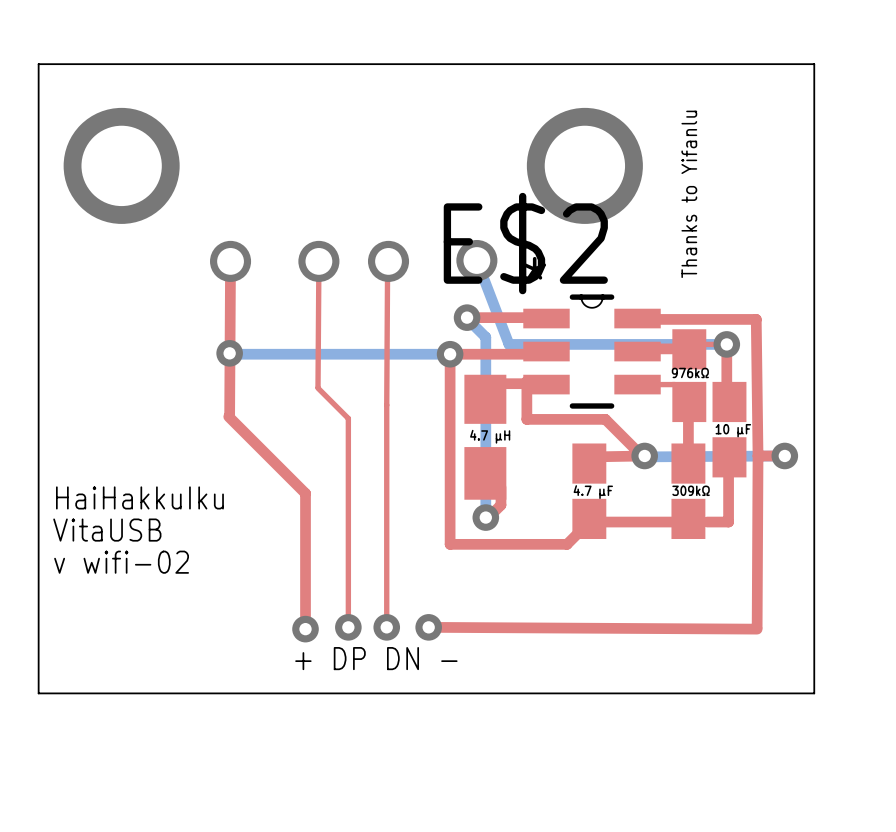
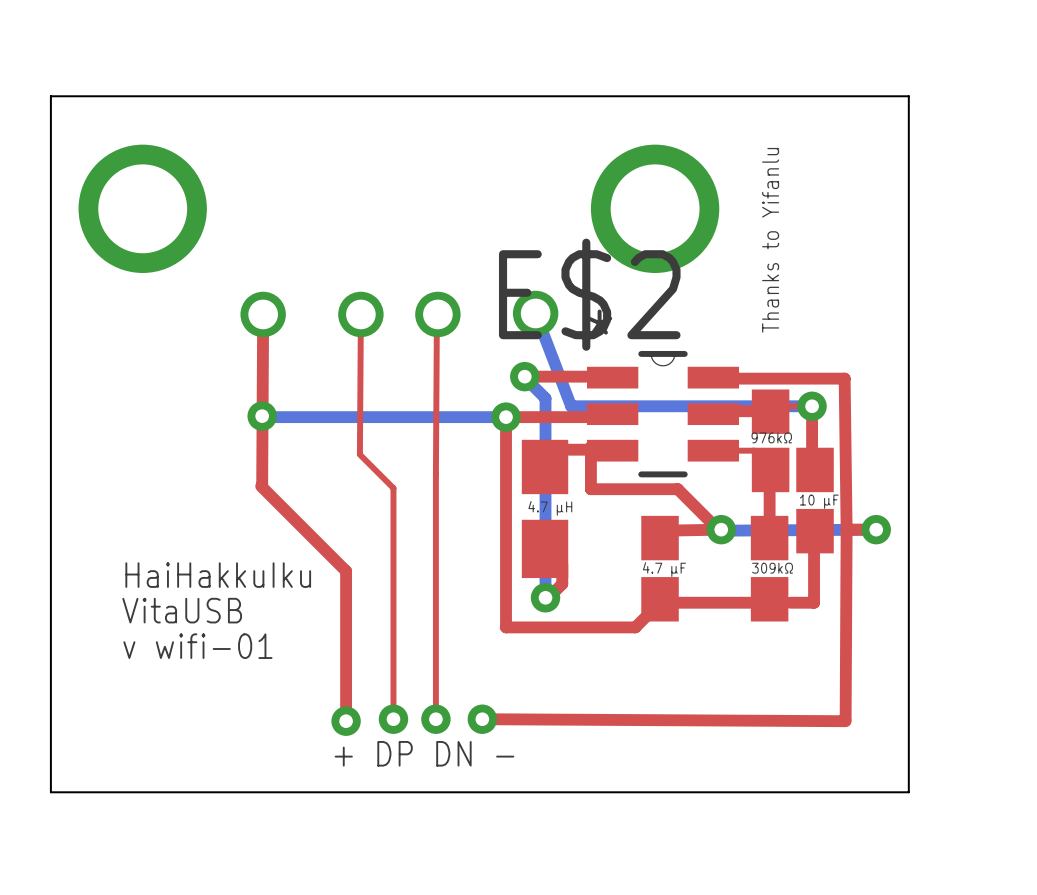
text position: HaiHakkuIku (139, 497) -> HaiHakkuIku (218, 575)
text position: VitaUSB (107, 530) -> VitaUSB (182, 610)
text: v wifi-02 (121, 562) -> v wifi-01 (197, 646)

